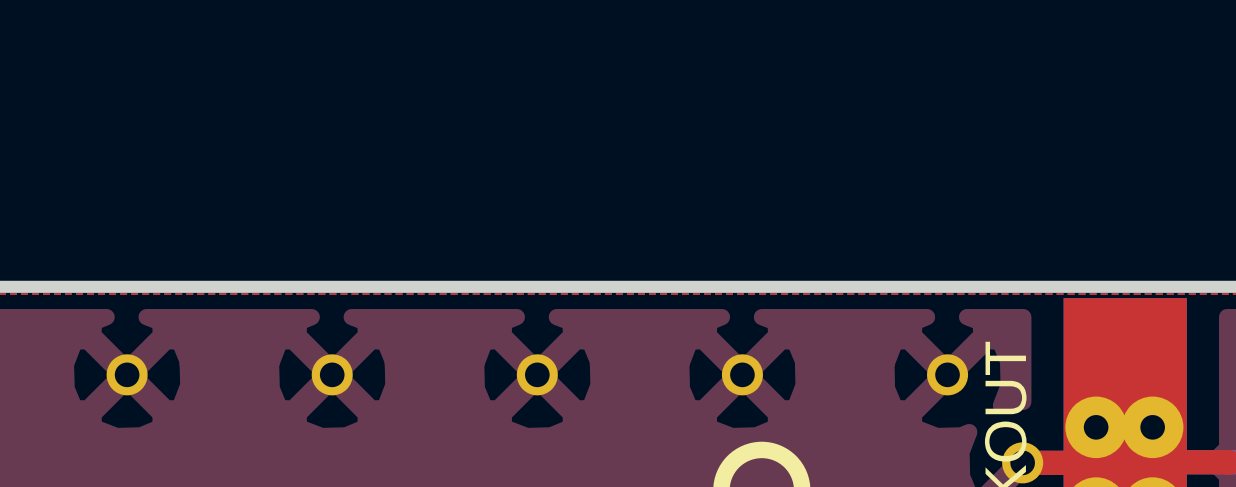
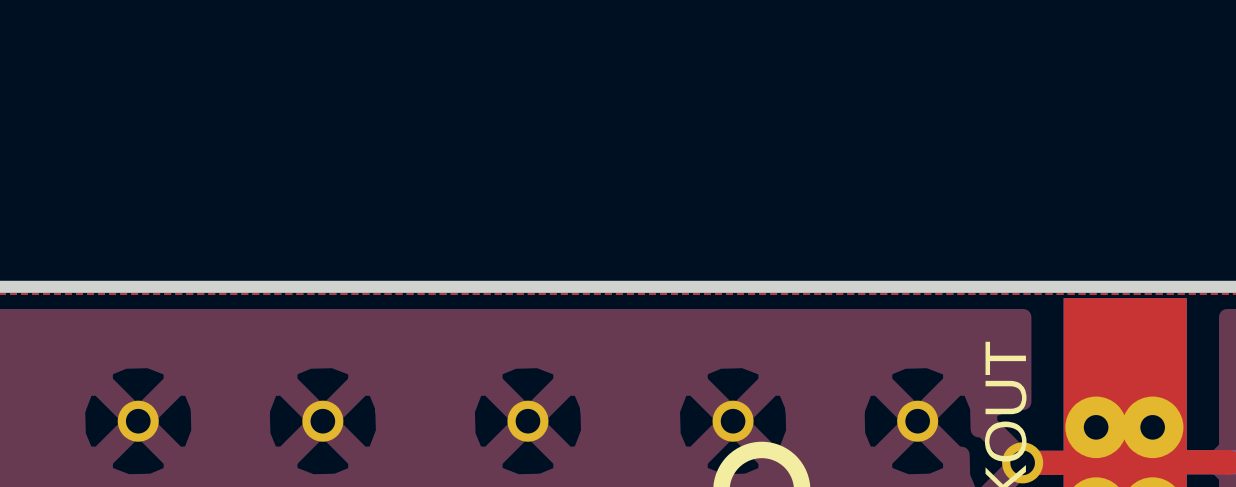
part position: (127, 374) -> (138, 421)
part position: (332, 374) -> (322, 421)
part position: (537, 374) -> (527, 421)
part position: (742, 374) -> (733, 421)
part position: (947, 374) -> (917, 421)

